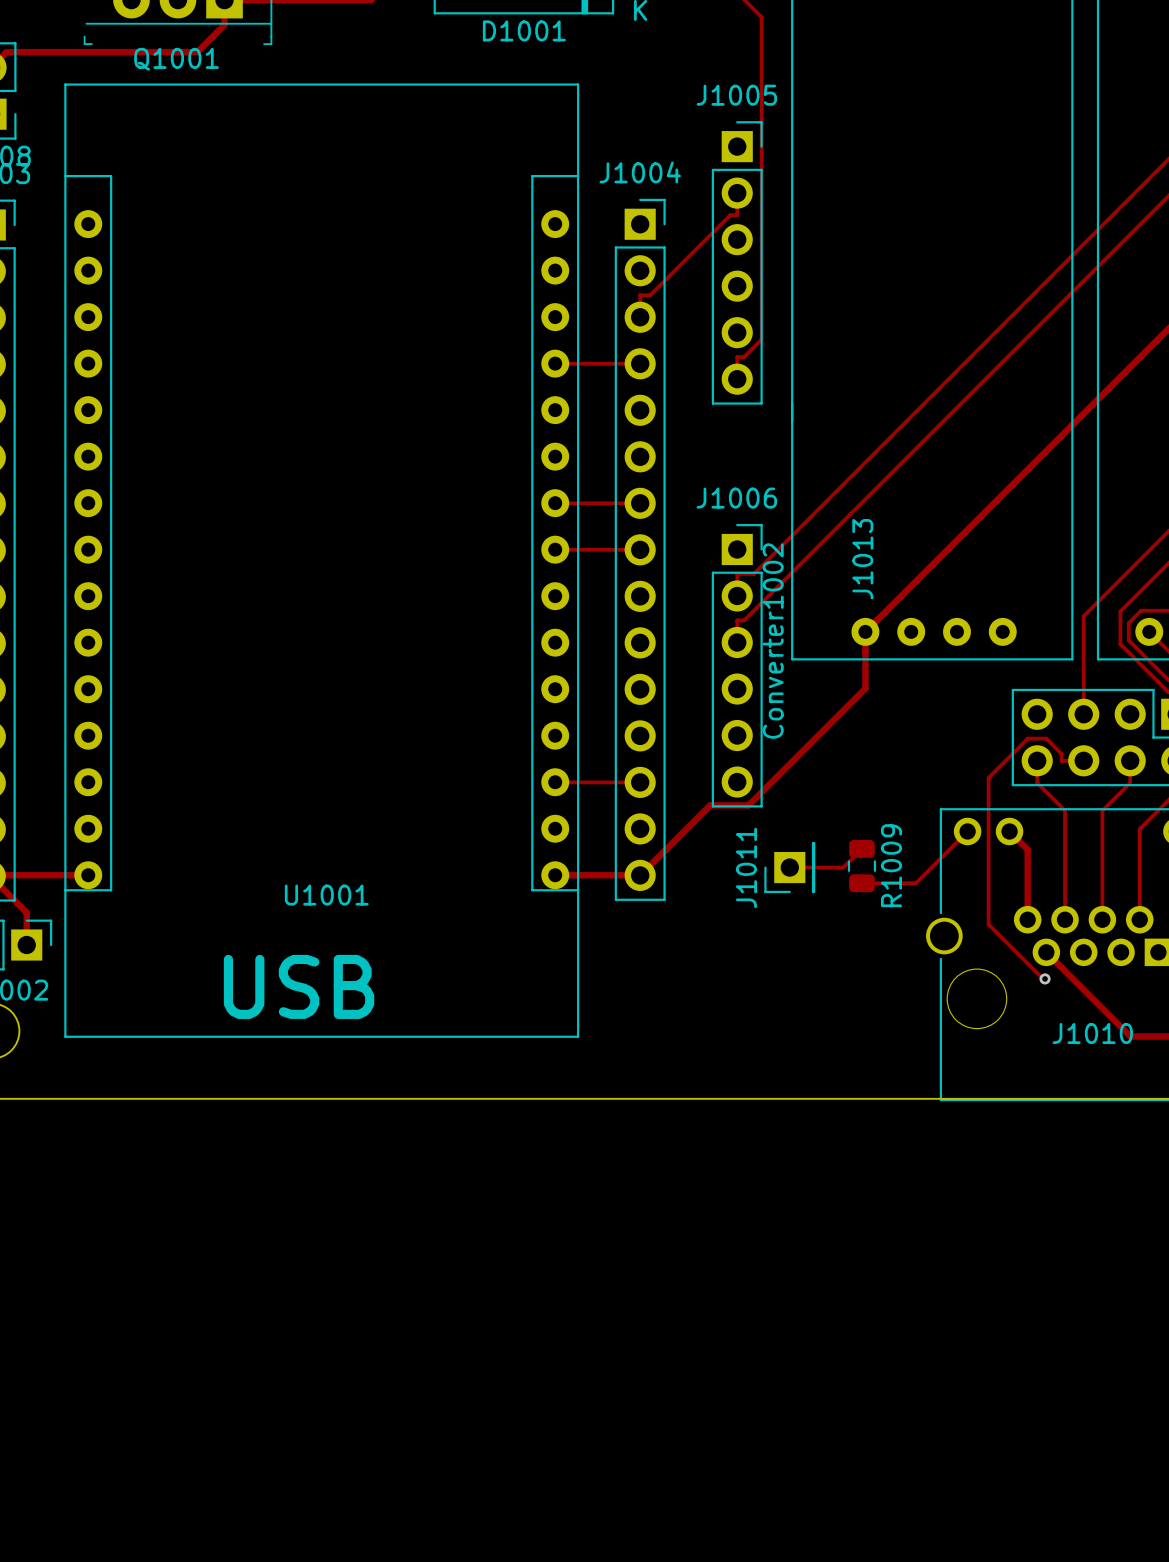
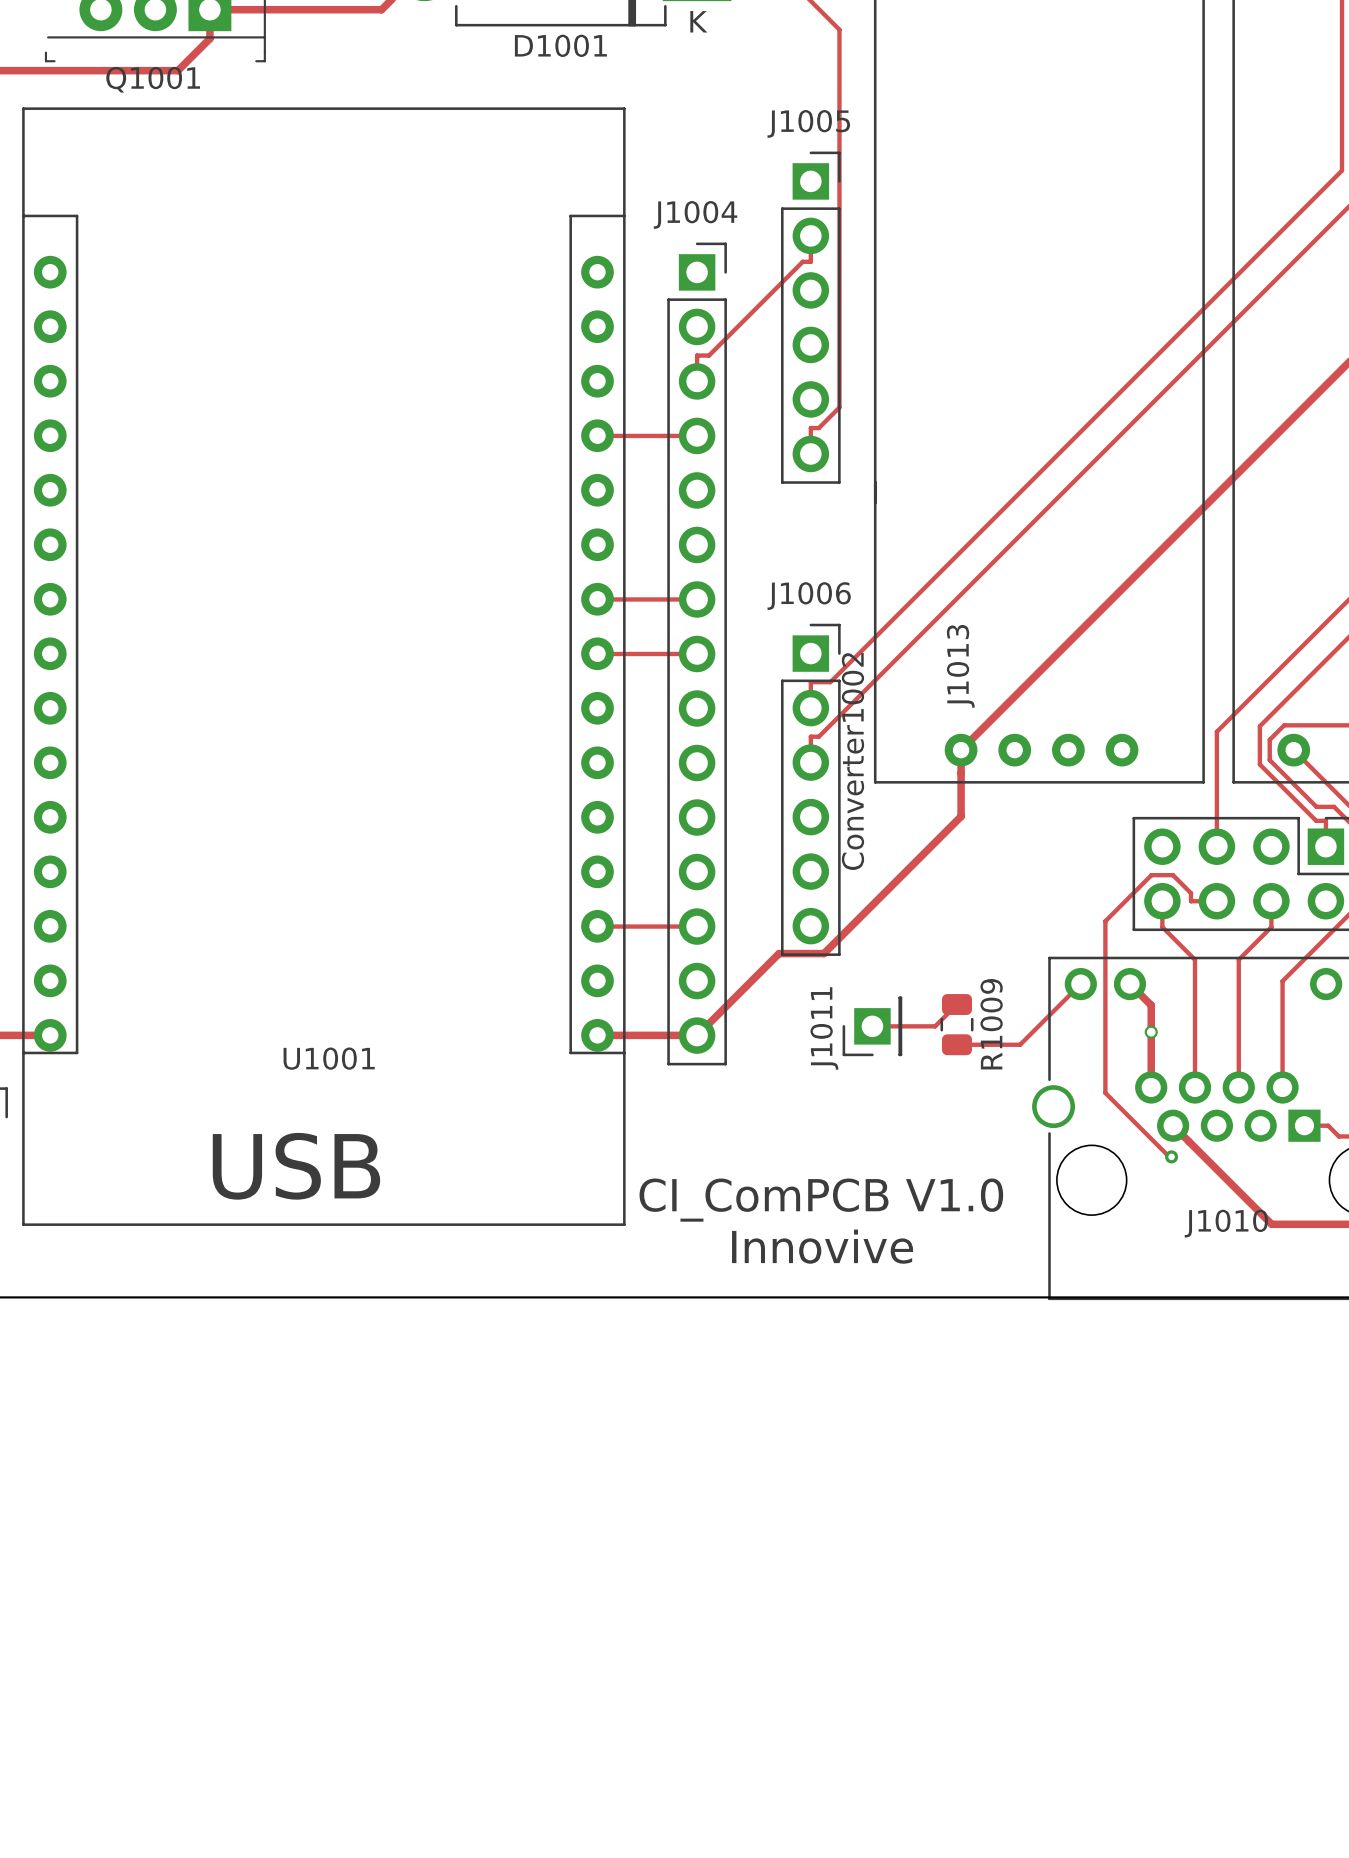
via: none -> (1151, 1032)
text: none -> CI_ComPCB V1.0 (821, 1200)
text: none -> Innovive (822, 1246)

